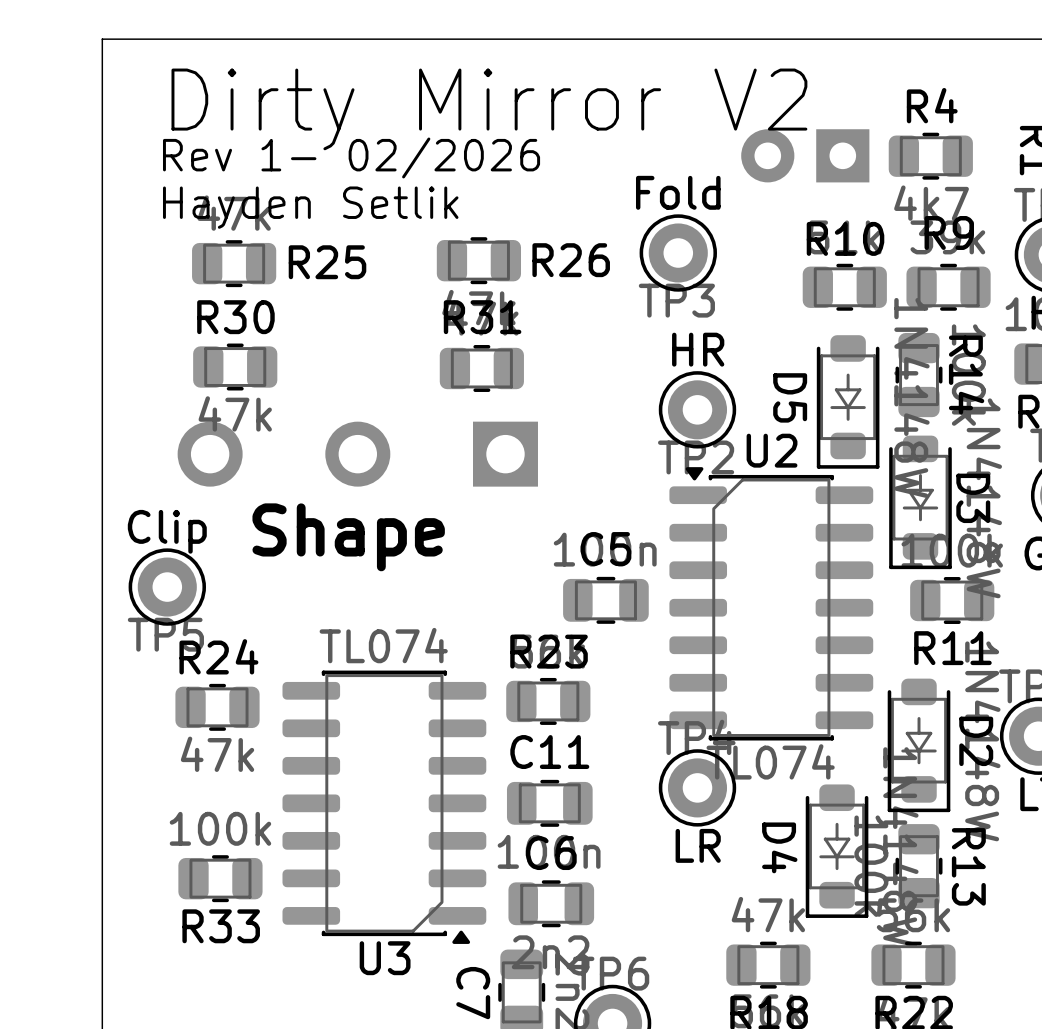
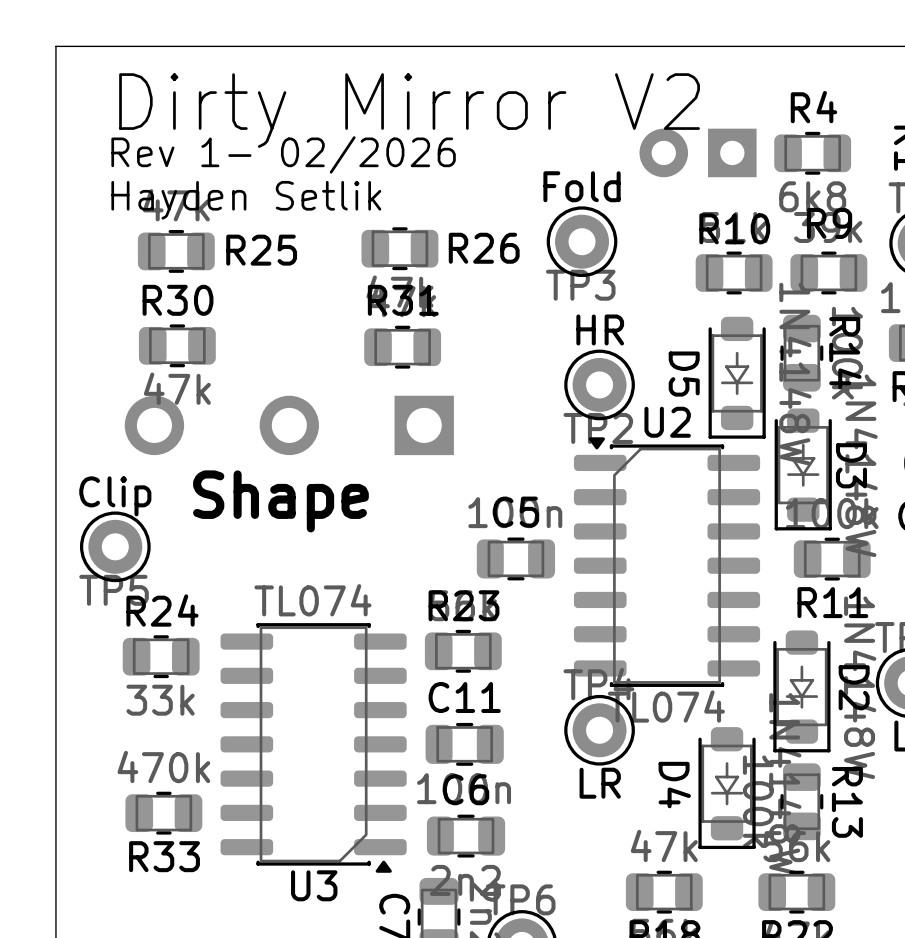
R4 value: 4k7 (931, 203) -> 6k8 (812, 196)
R24 value: 47k (217, 754) -> 33k (160, 700)
R33 value: 100k (220, 828) -> 470k (163, 766)

